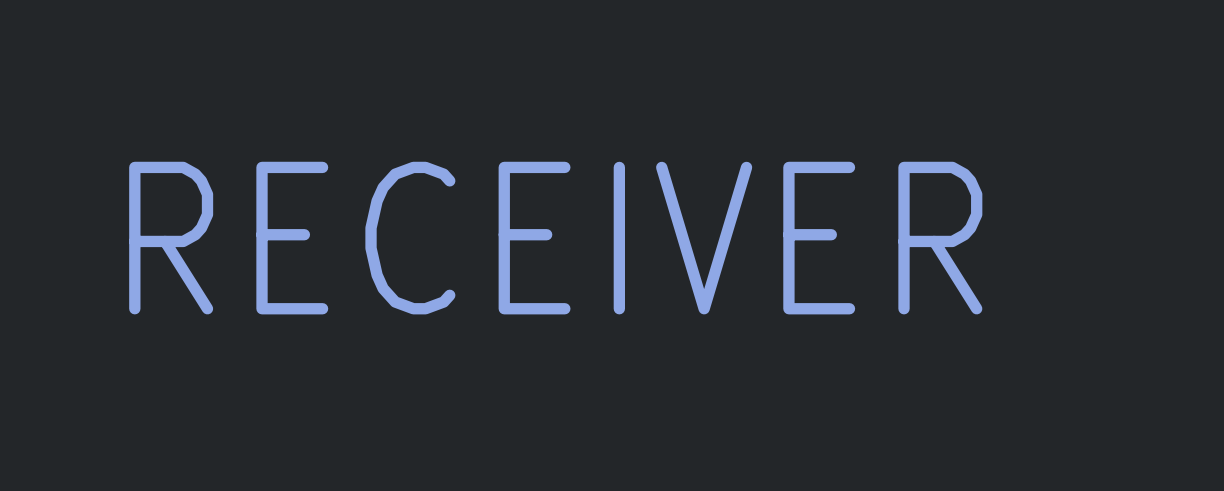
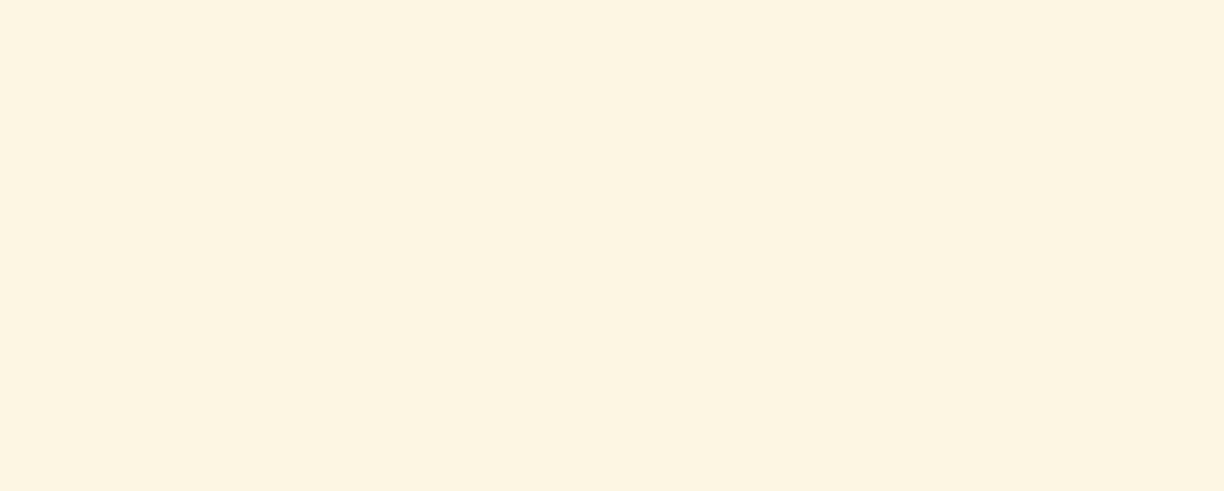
text: RECEIVER (555, 238) -> none

